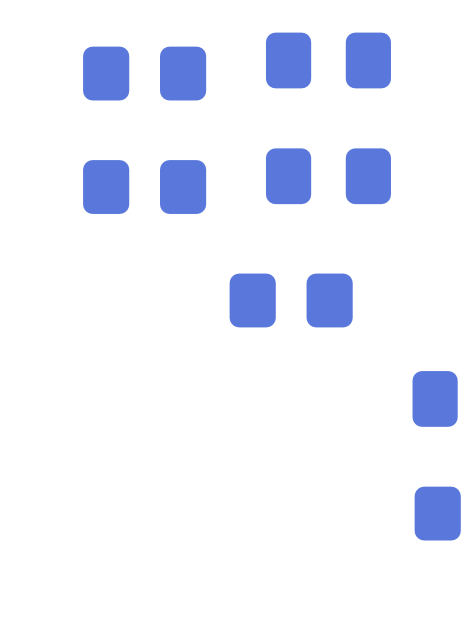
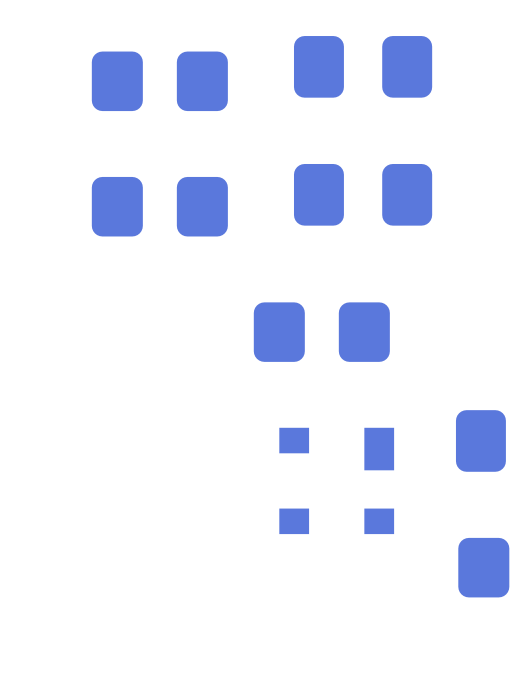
part: none -> (336, 480)

